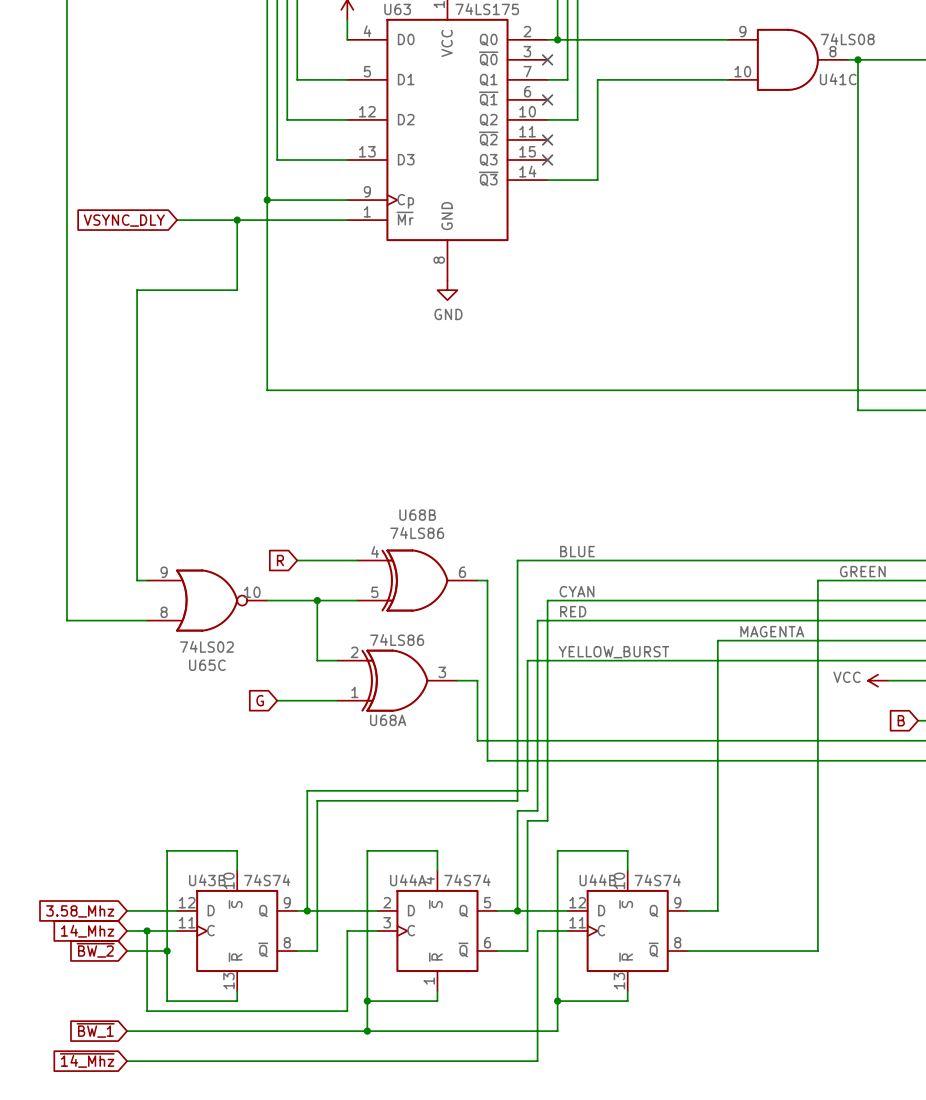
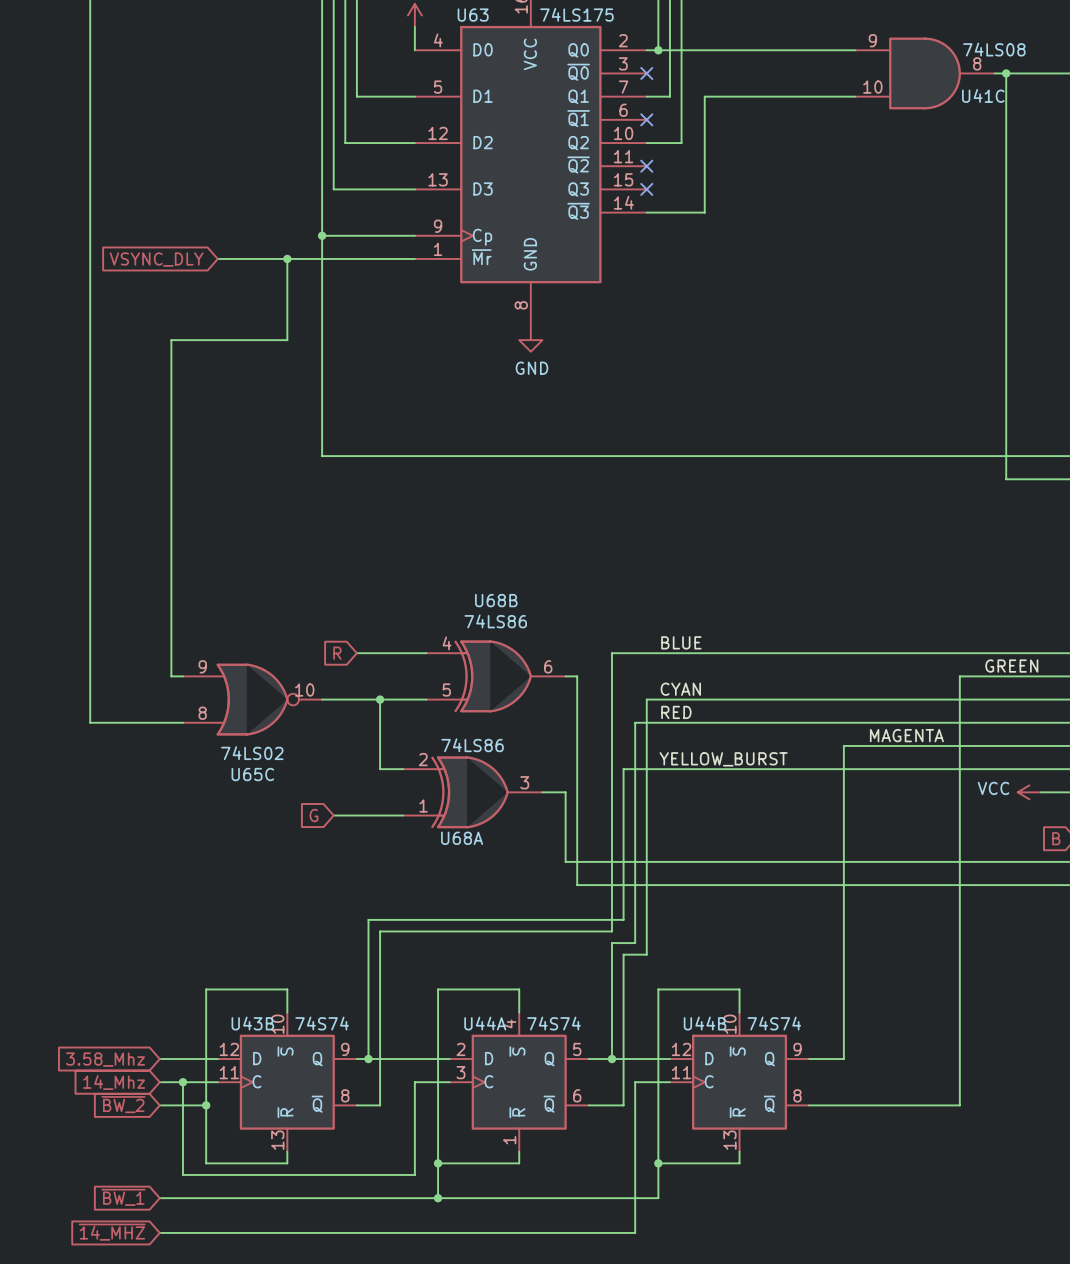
global label: ~{14_Mhz} (87, 1060) -> ~{14_MHZ} (112, 1232)

